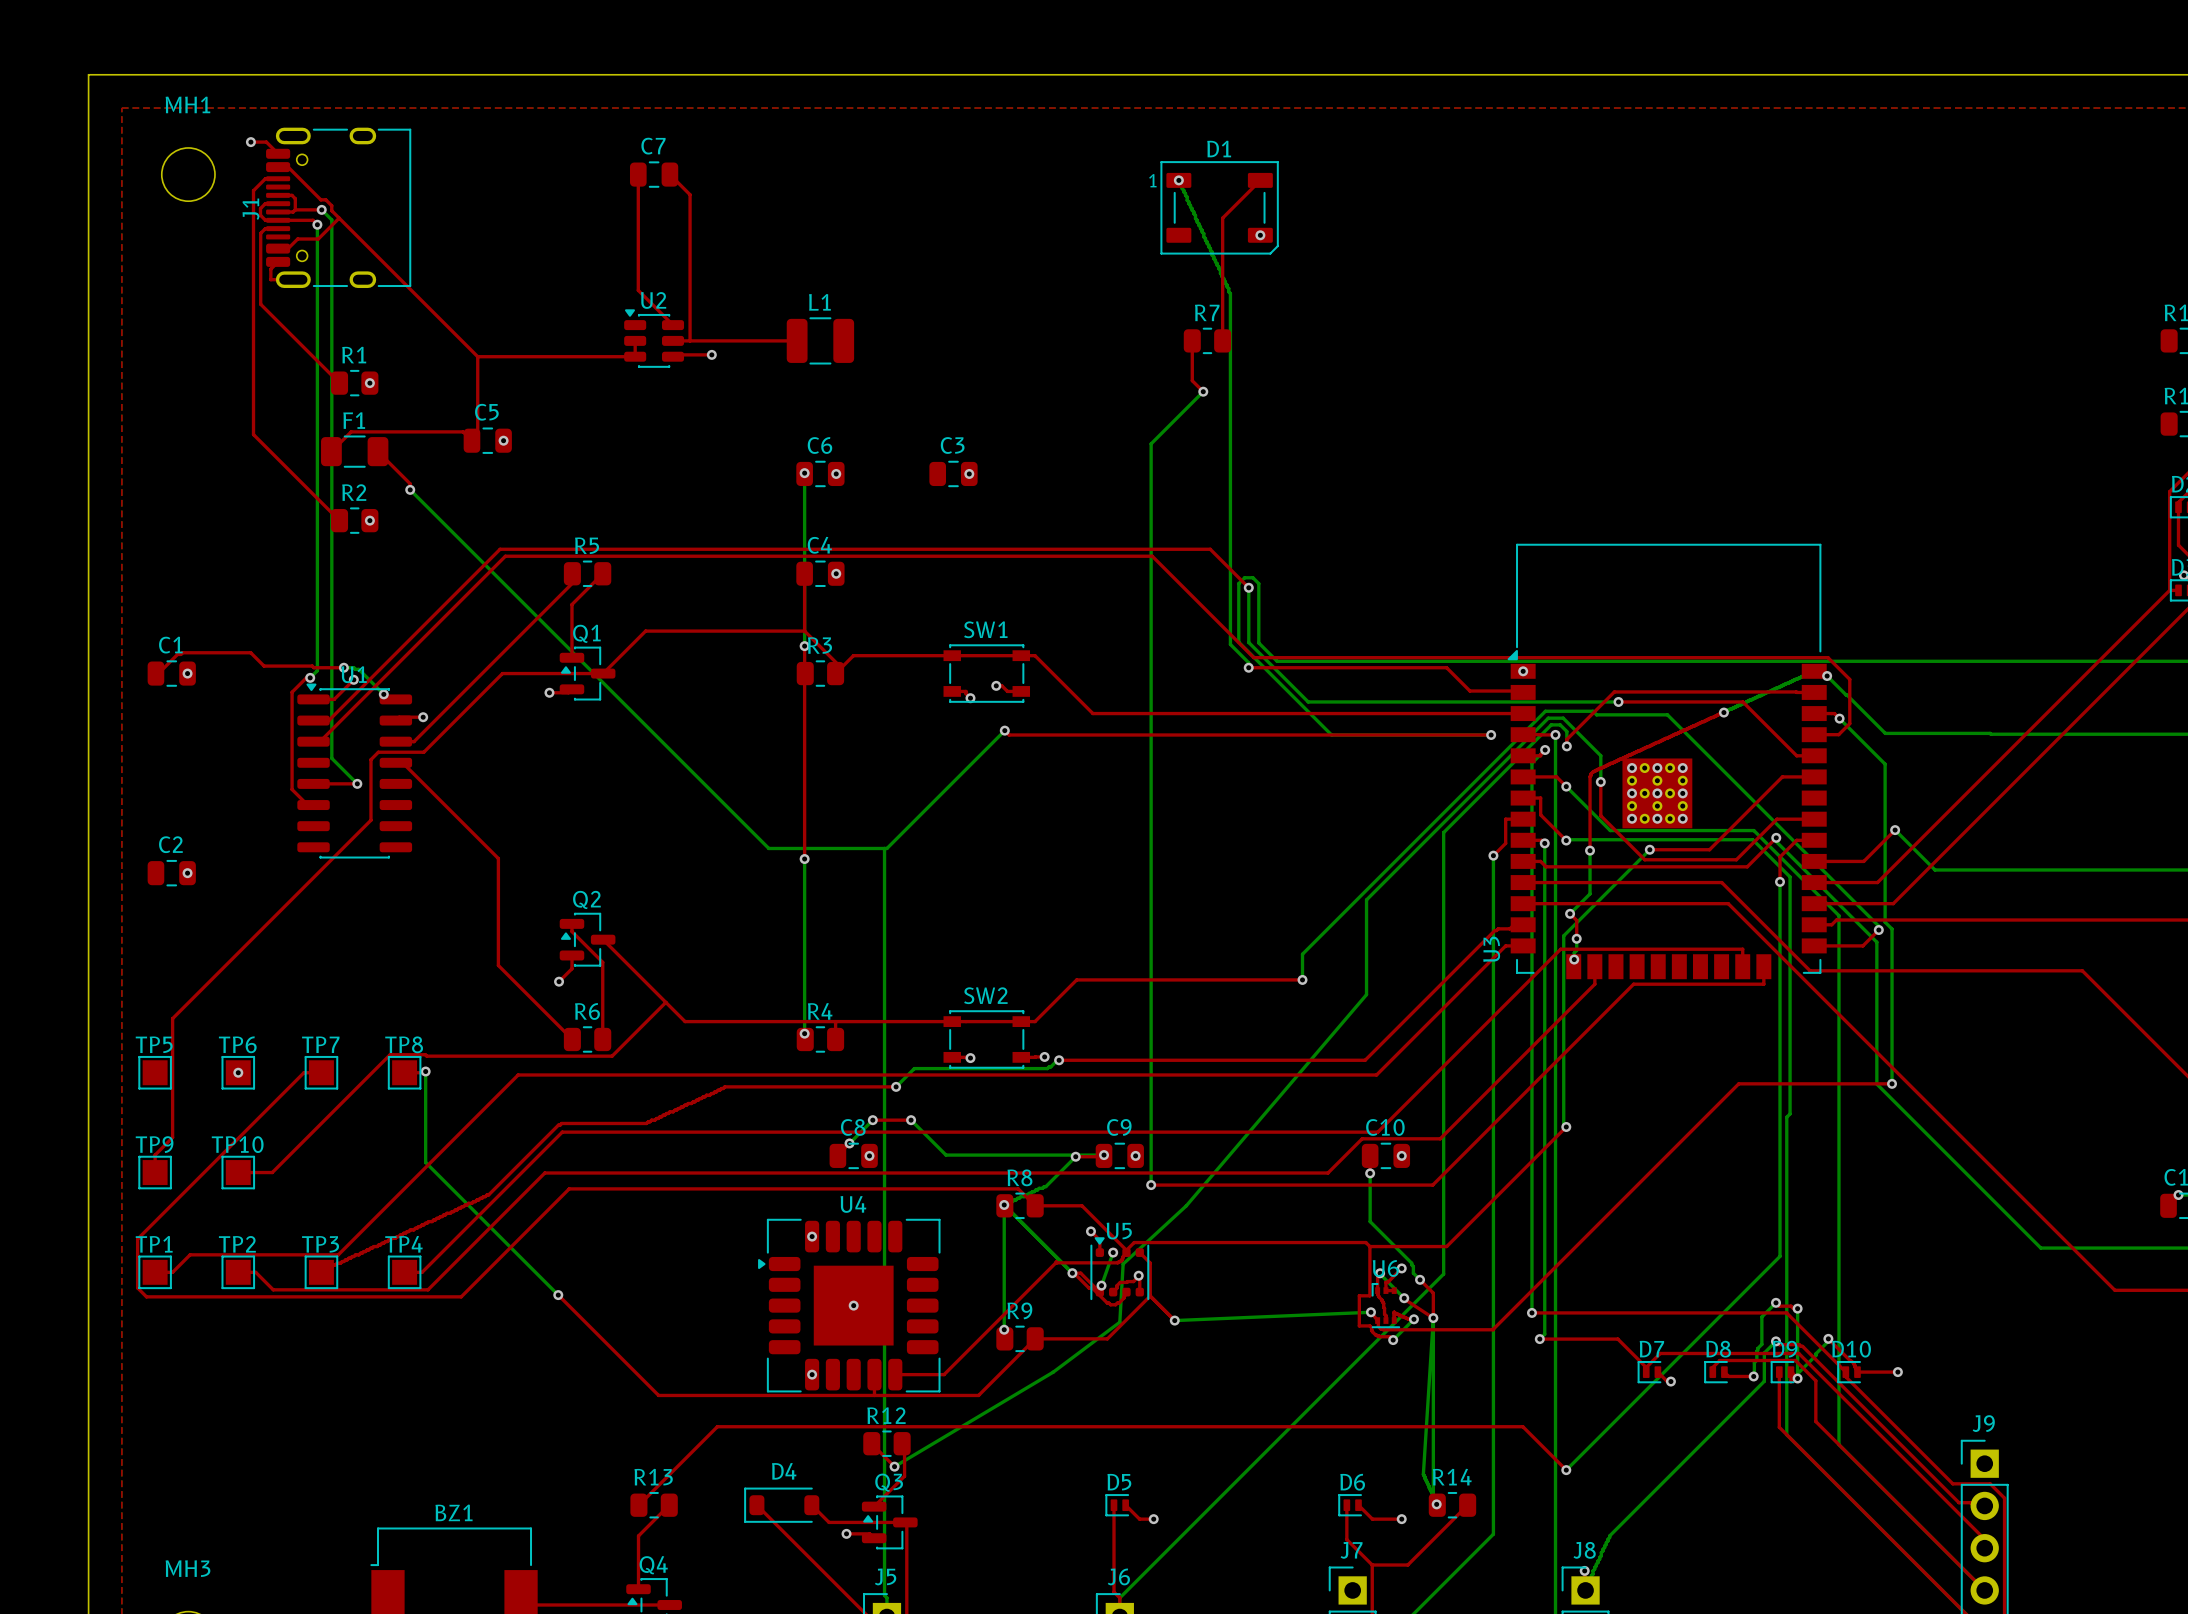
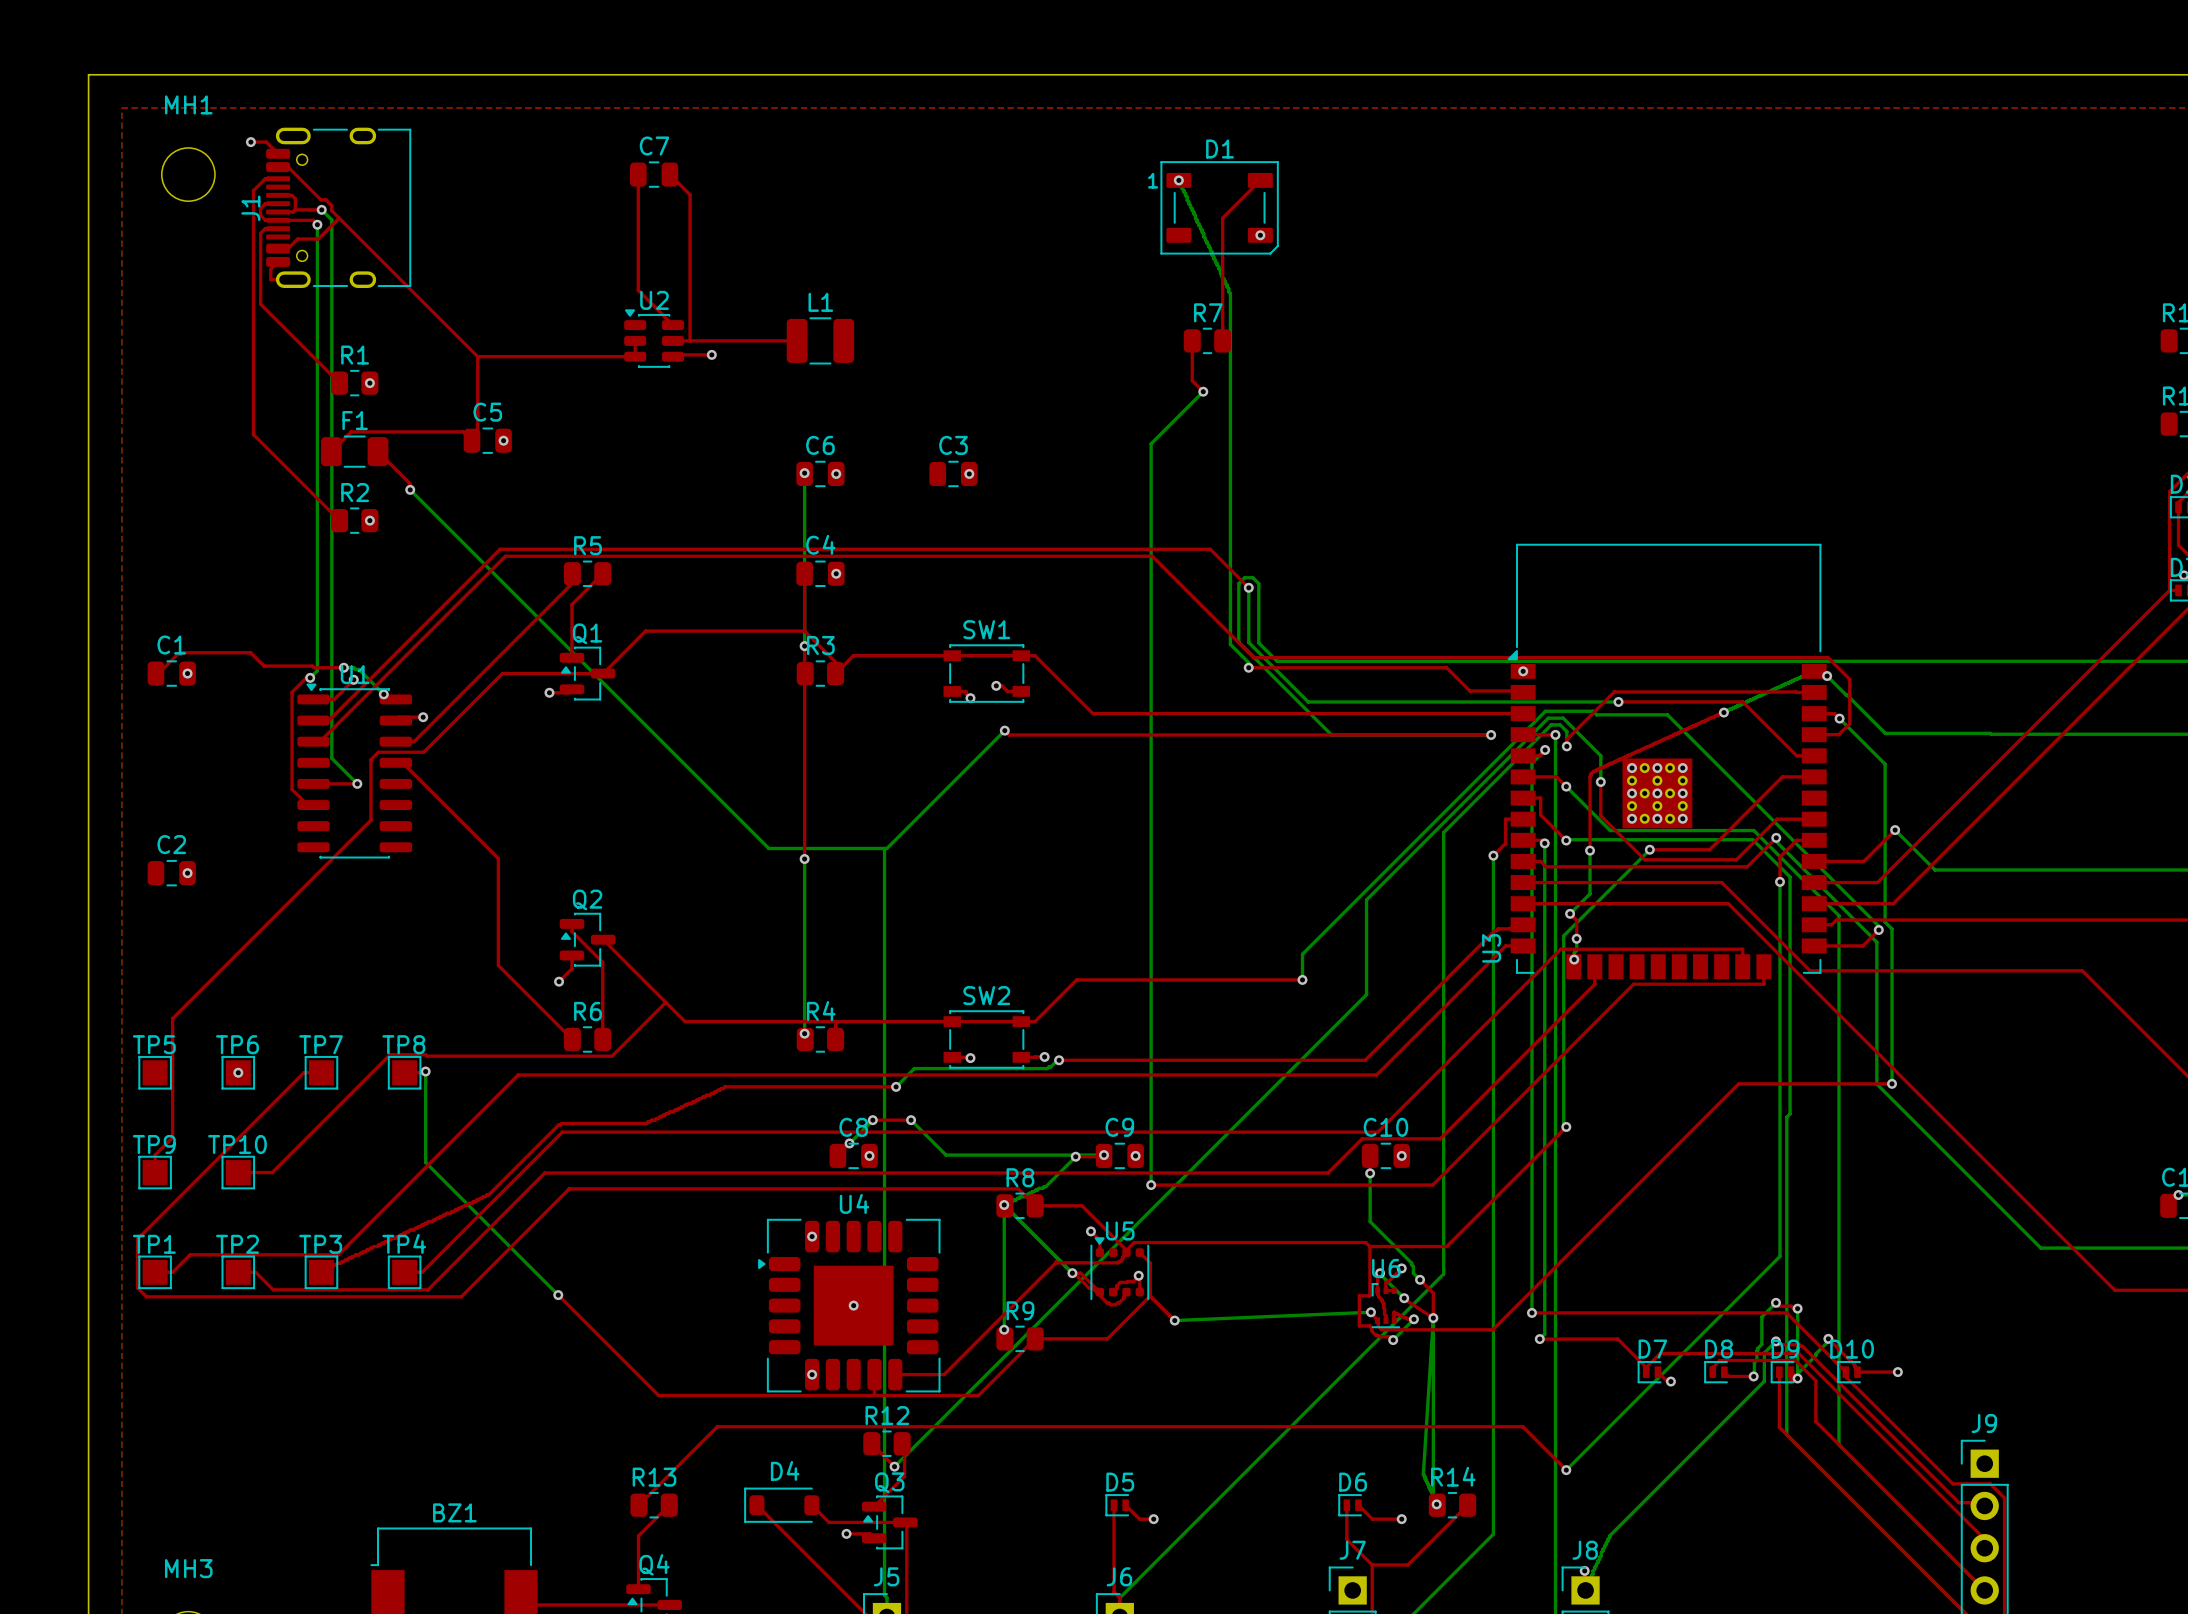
bottom track: (1366, 994) (1186, 1205) (1123, 1264) (1119, 1322) (1053, 1372) (894, 1466) -> (1366, 994) (894, 1466)
bottom track: (1113, 1252) (1101, 1285) -> none
via: (1113, 1252) -> none
via: (1101, 1285) -> none

